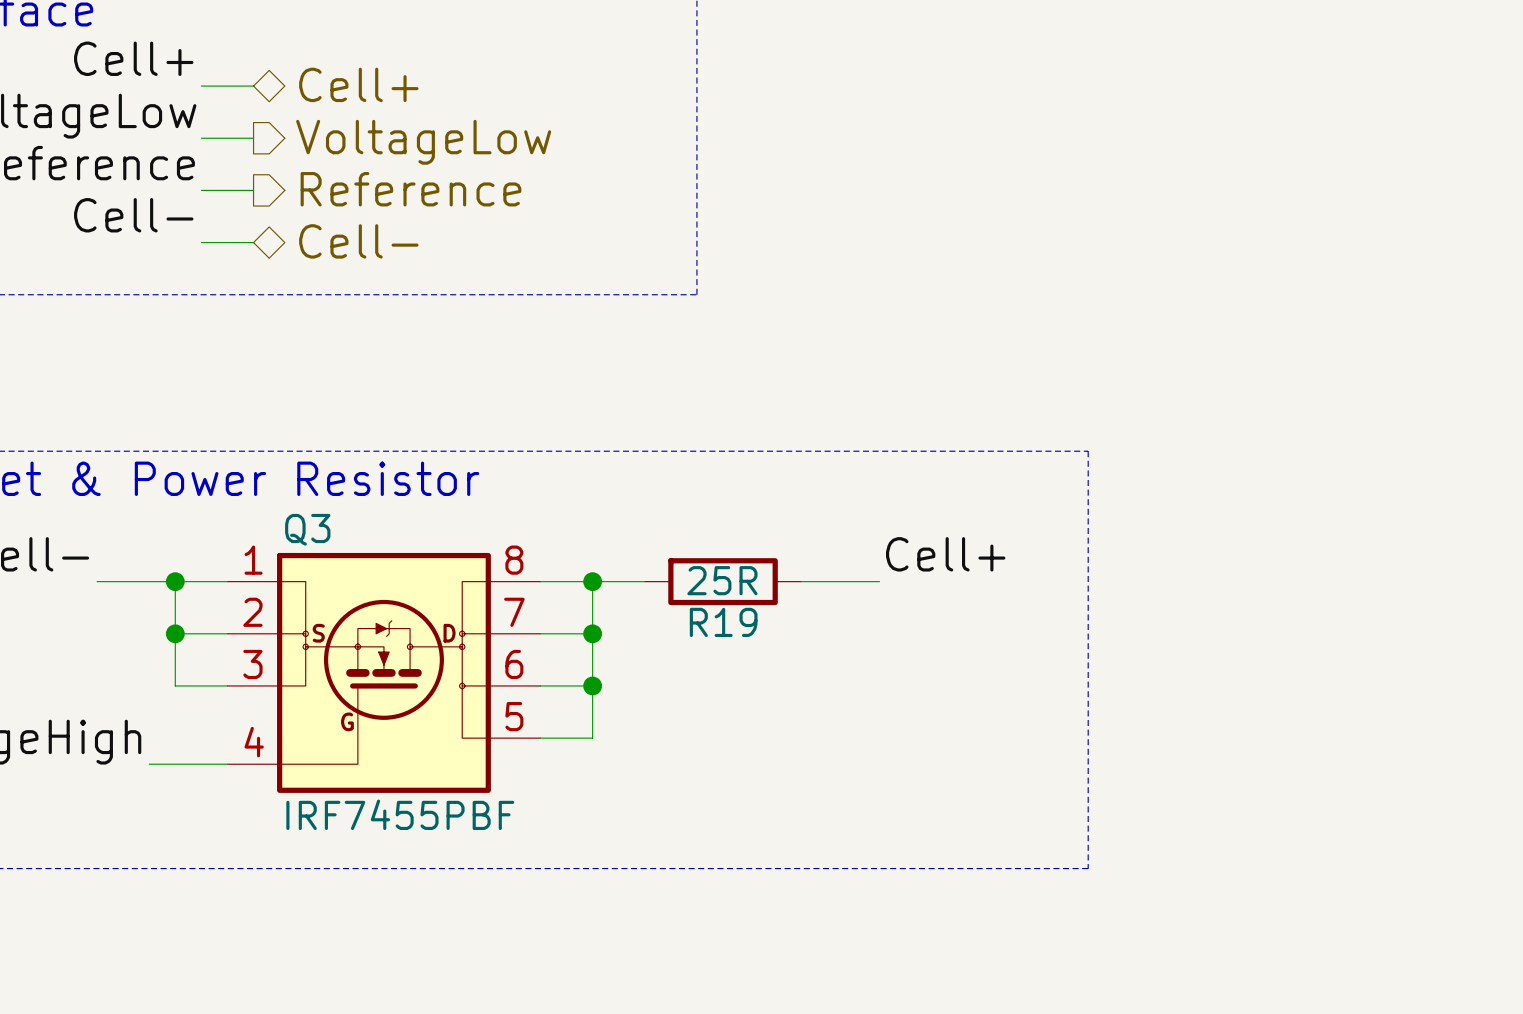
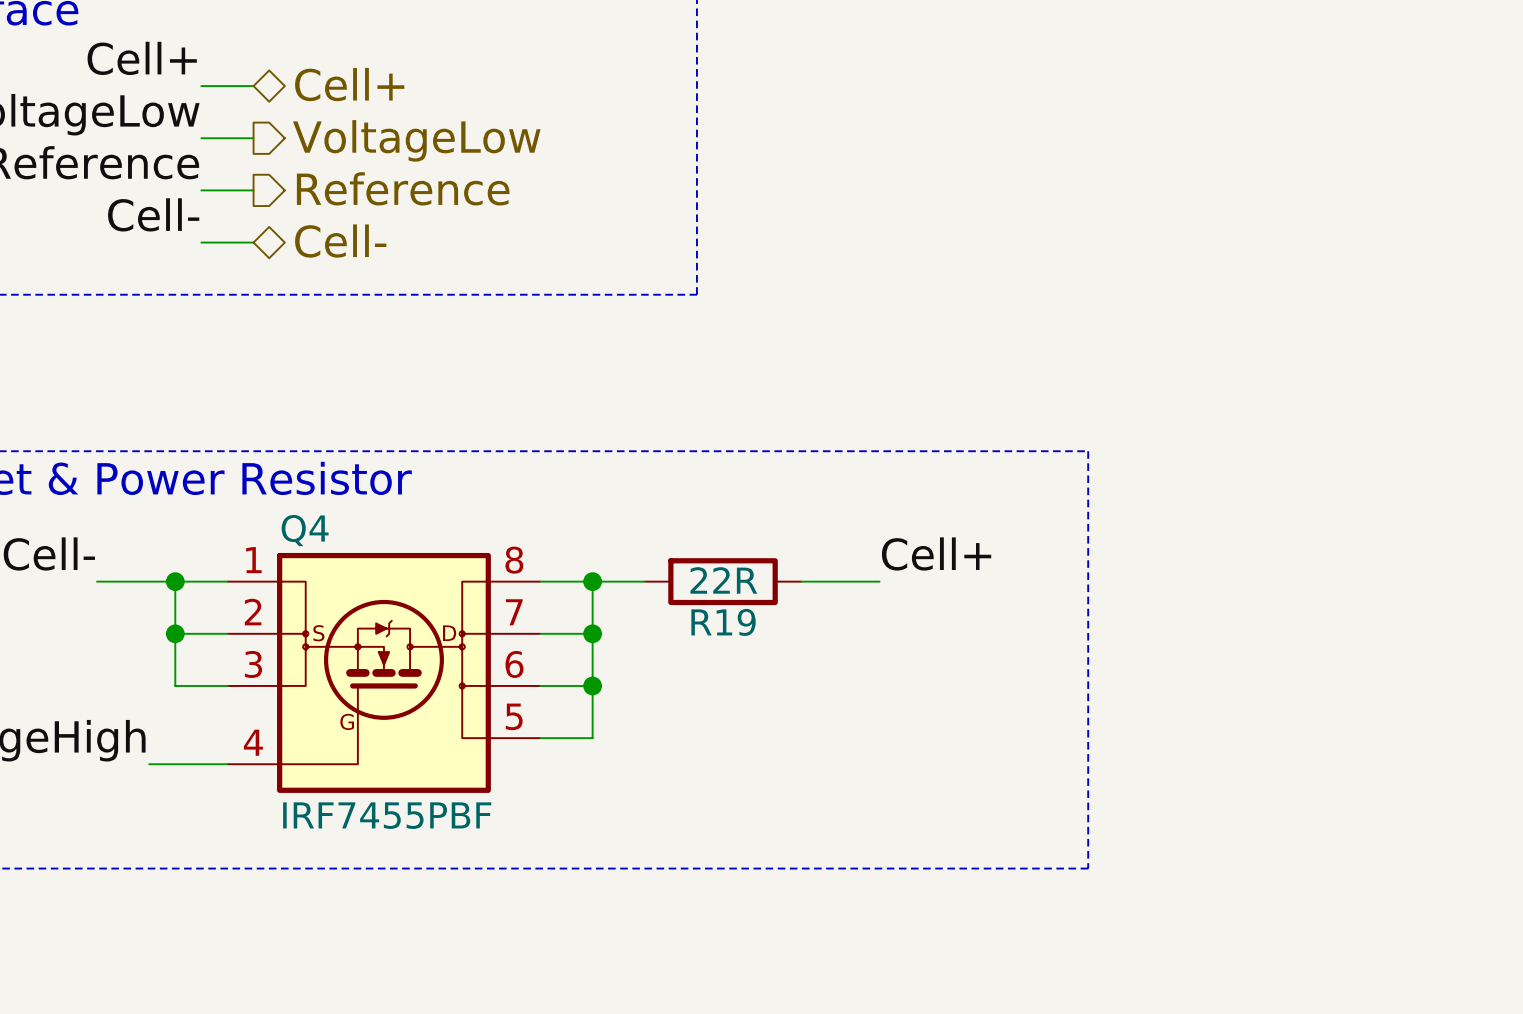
Q3 name: Q3 (307, 529) -> Q4 (305, 530)
R19 value: 25R (722, 580) -> 22R (723, 580)

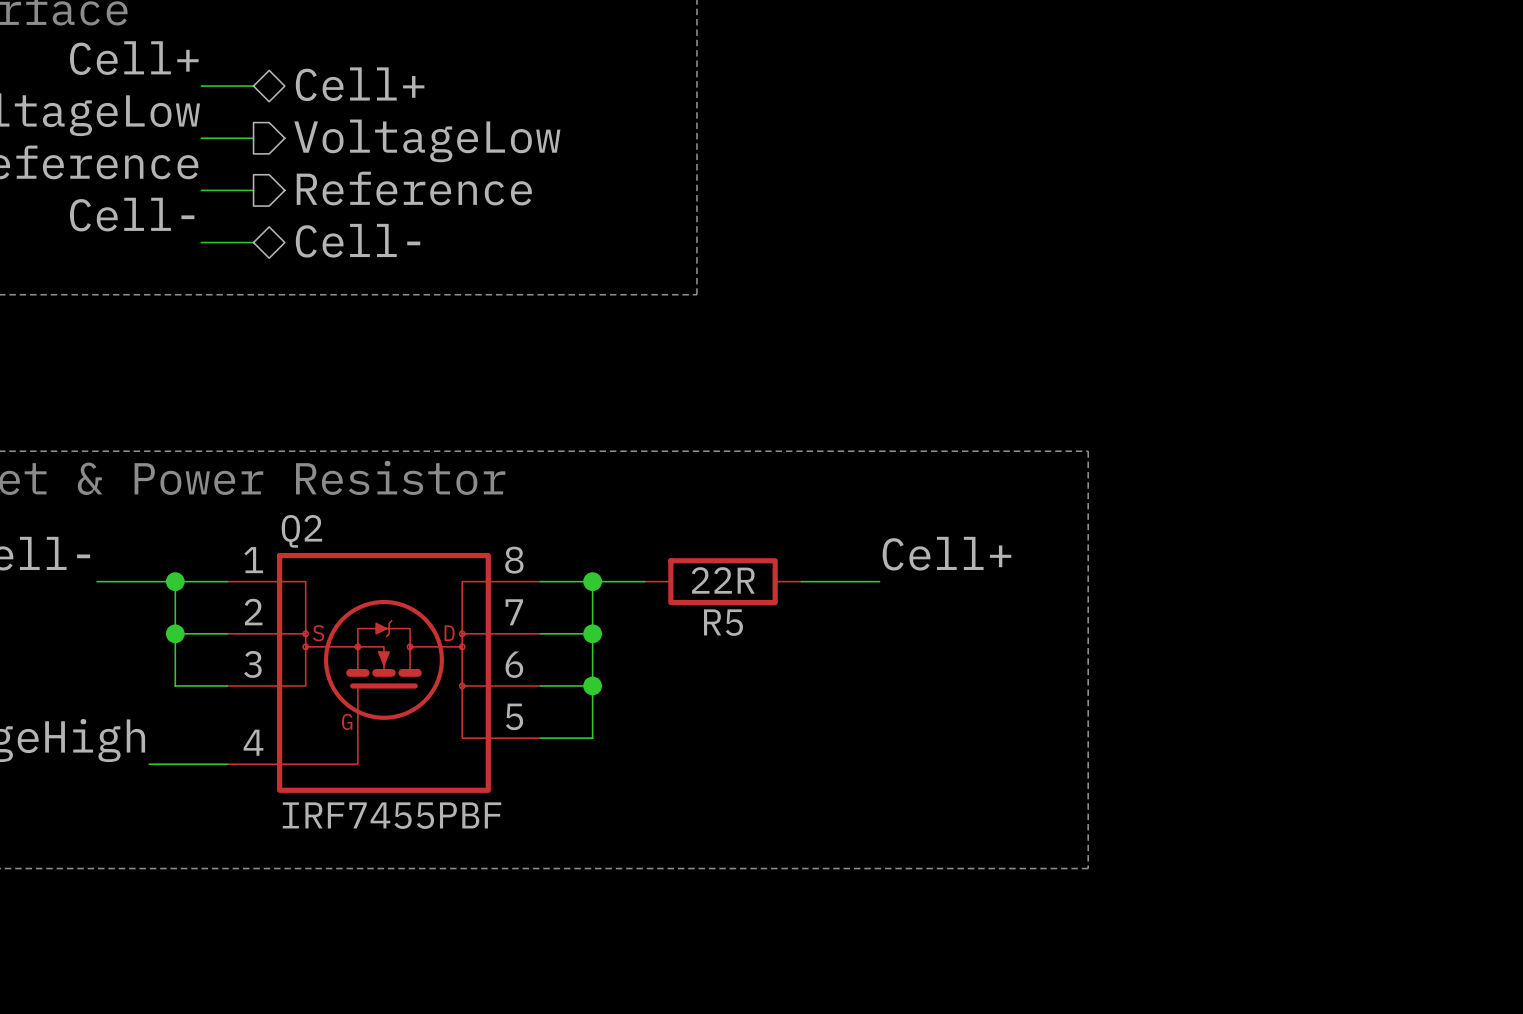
Q4 name: Q4 (305, 530) -> Q2 (301, 531)
R19 name: R19 (723, 622) -> R5 (723, 622)

